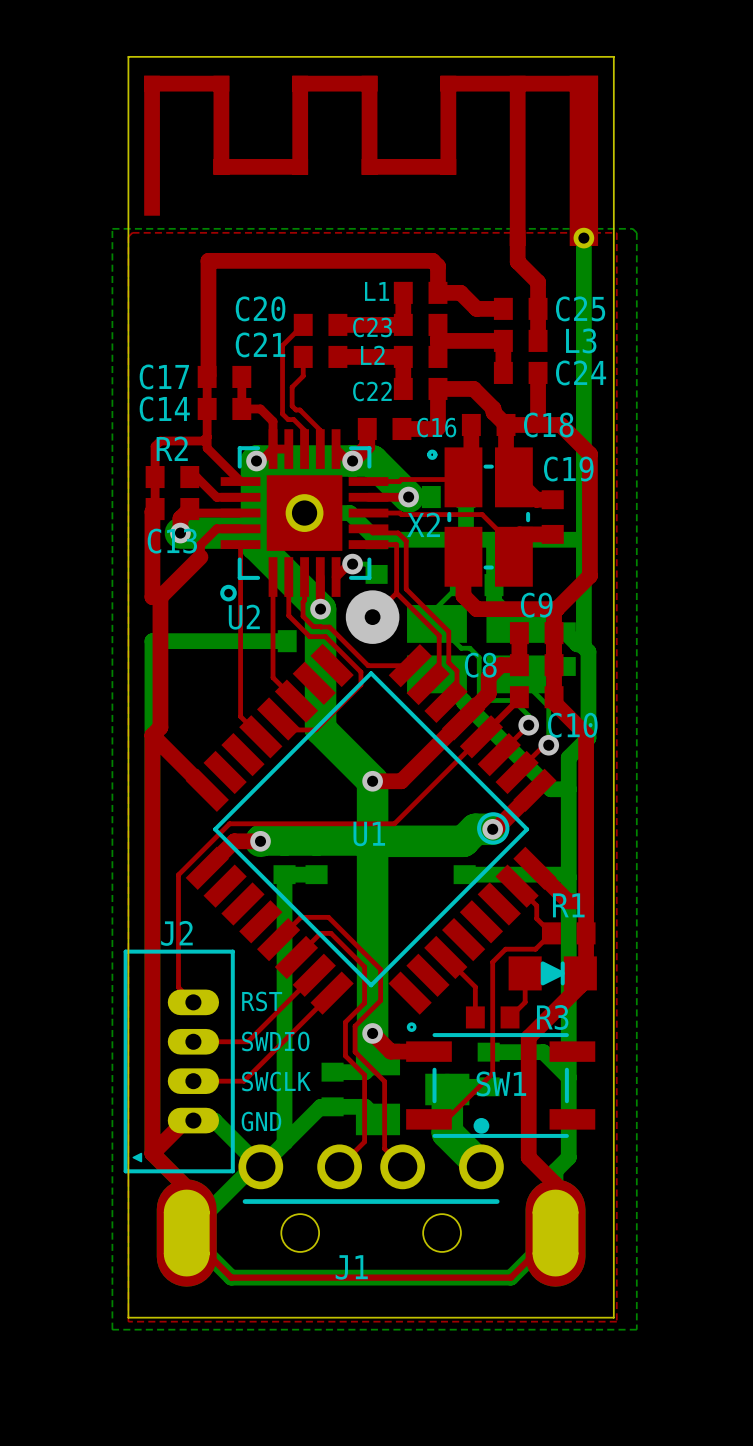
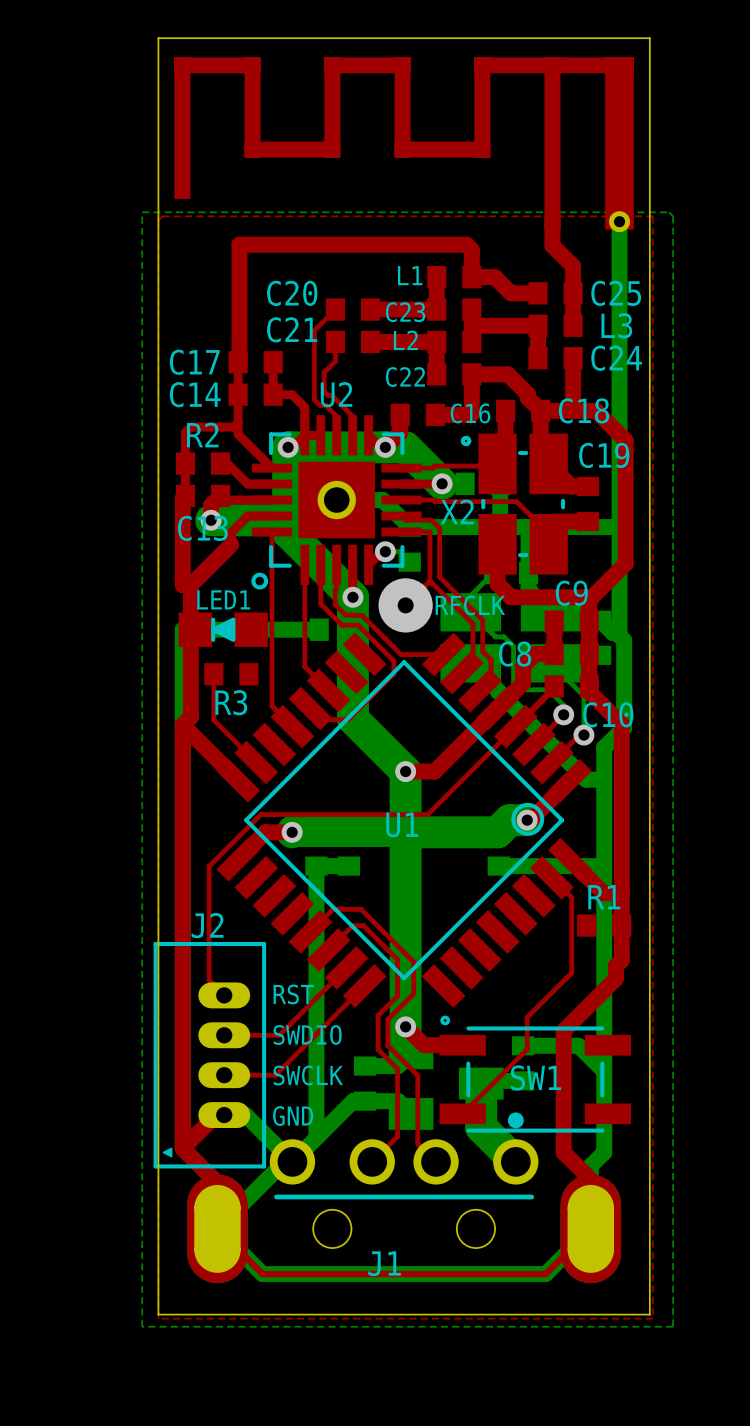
text: none -> LED1 (223, 599)
U2 name position: U2 (244, 617) -> U2 (336, 394)
text: none -> RFCLK (470, 605)
top track: none -> (213, 674) (213, 720) (256, 762)
top track: (536, 918) (551, 933) (535, 949) (505, 949) (492, 962) (492, 1024) -> (571, 910) (571, 972) (527, 1017)
top track: (445, 957) (475, 987) (475, 1017) -> none
top track: (525, 973) (525, 1002) (510, 1017) -> none
part rotation: 0° (552, 973) -> 180° (223, 629)
part position: (552, 973) -> (223, 629)
R3 position: (492, 1017) -> (231, 674)
R3 name position: R3 (552, 1017) -> R3 (231, 702)
top track: (492, 1055) (492, 1073) (446, 1119) (428, 1119) -> (527, 1049) (462, 1113)

